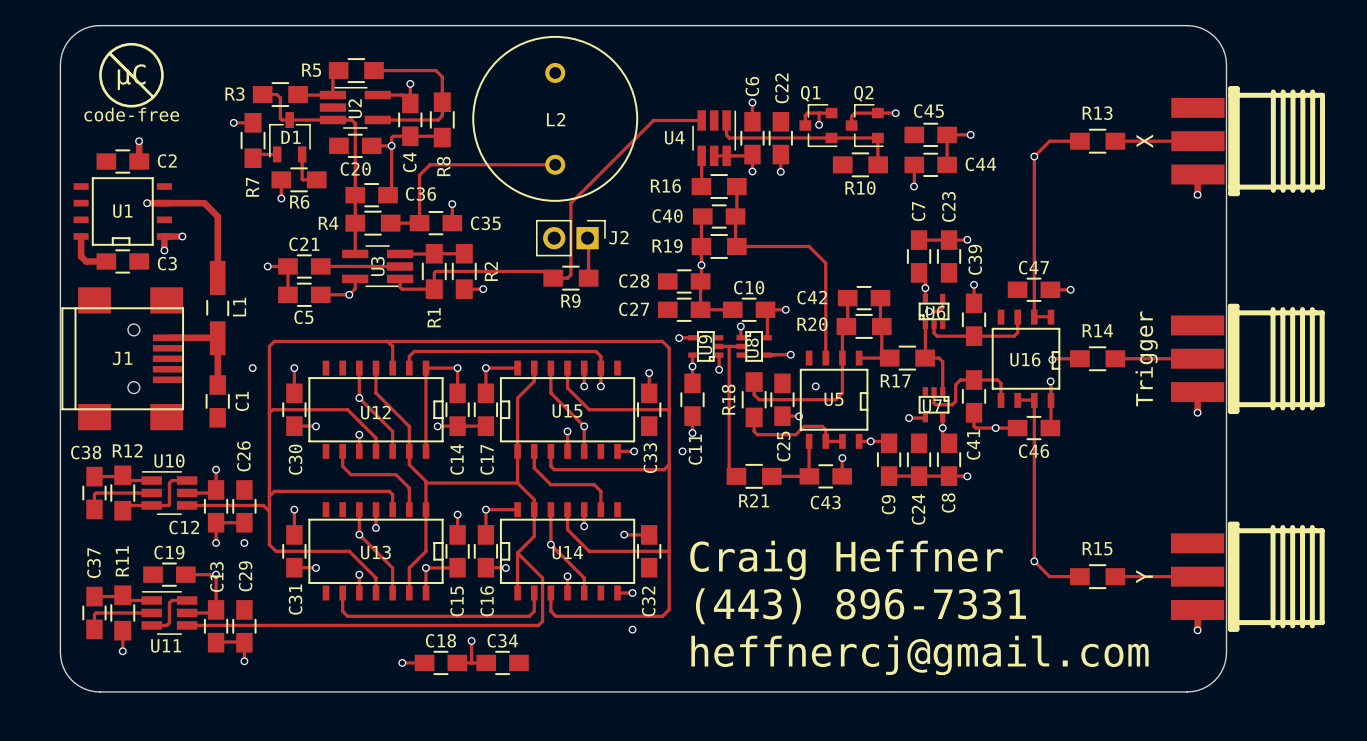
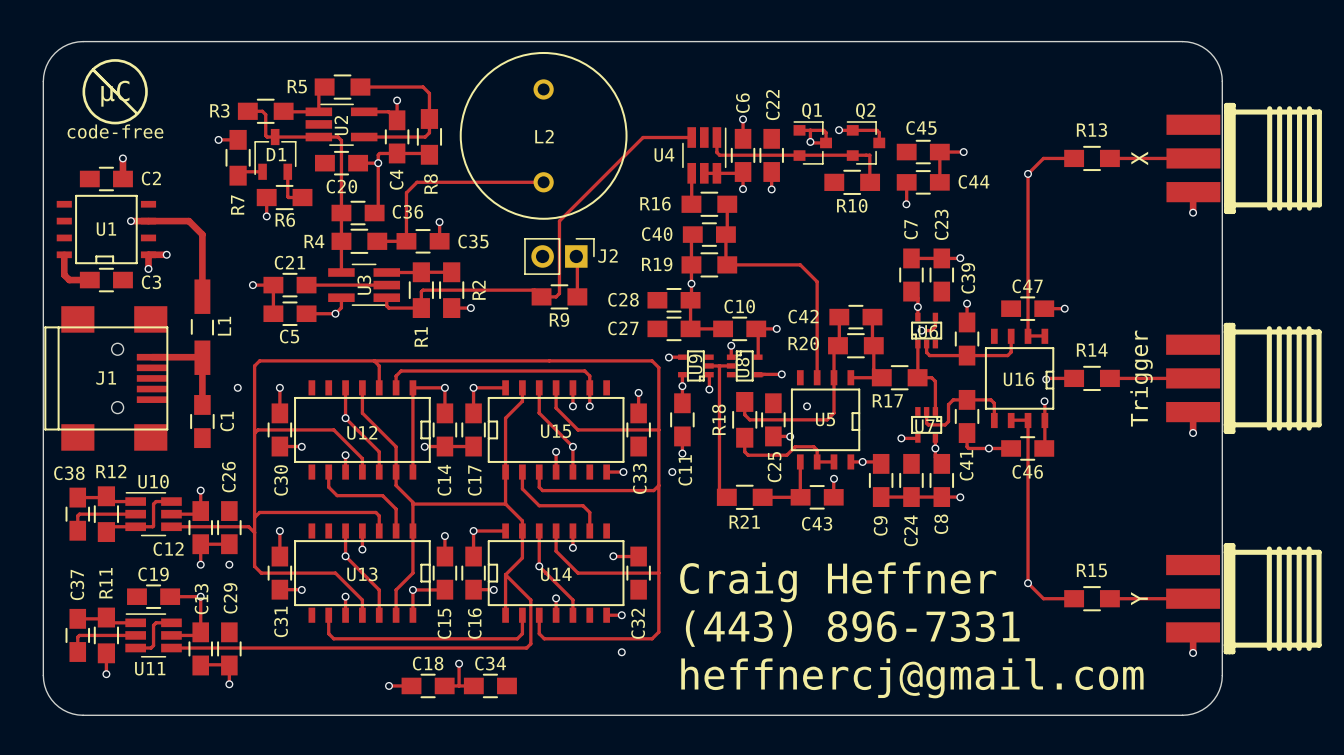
track: none -> (799, 130) (823, 130) (826, 132) (826, 142) (811, 142)
track: (831, 113) (807, 113) (805, 115) (805, 125) -> none
track: none -> (839, 130) (876, 130) (879, 132) (879, 142)
track: (895, 113) (854, 113) (851, 116) (851, 125) -> none
via position: (895, 113) -> (839, 130)
Q1 rotation: 0° (818, 125) -> 180° (812, 142)
Q2 rotation: 0° (864, 125) -> 180° (865, 142)

